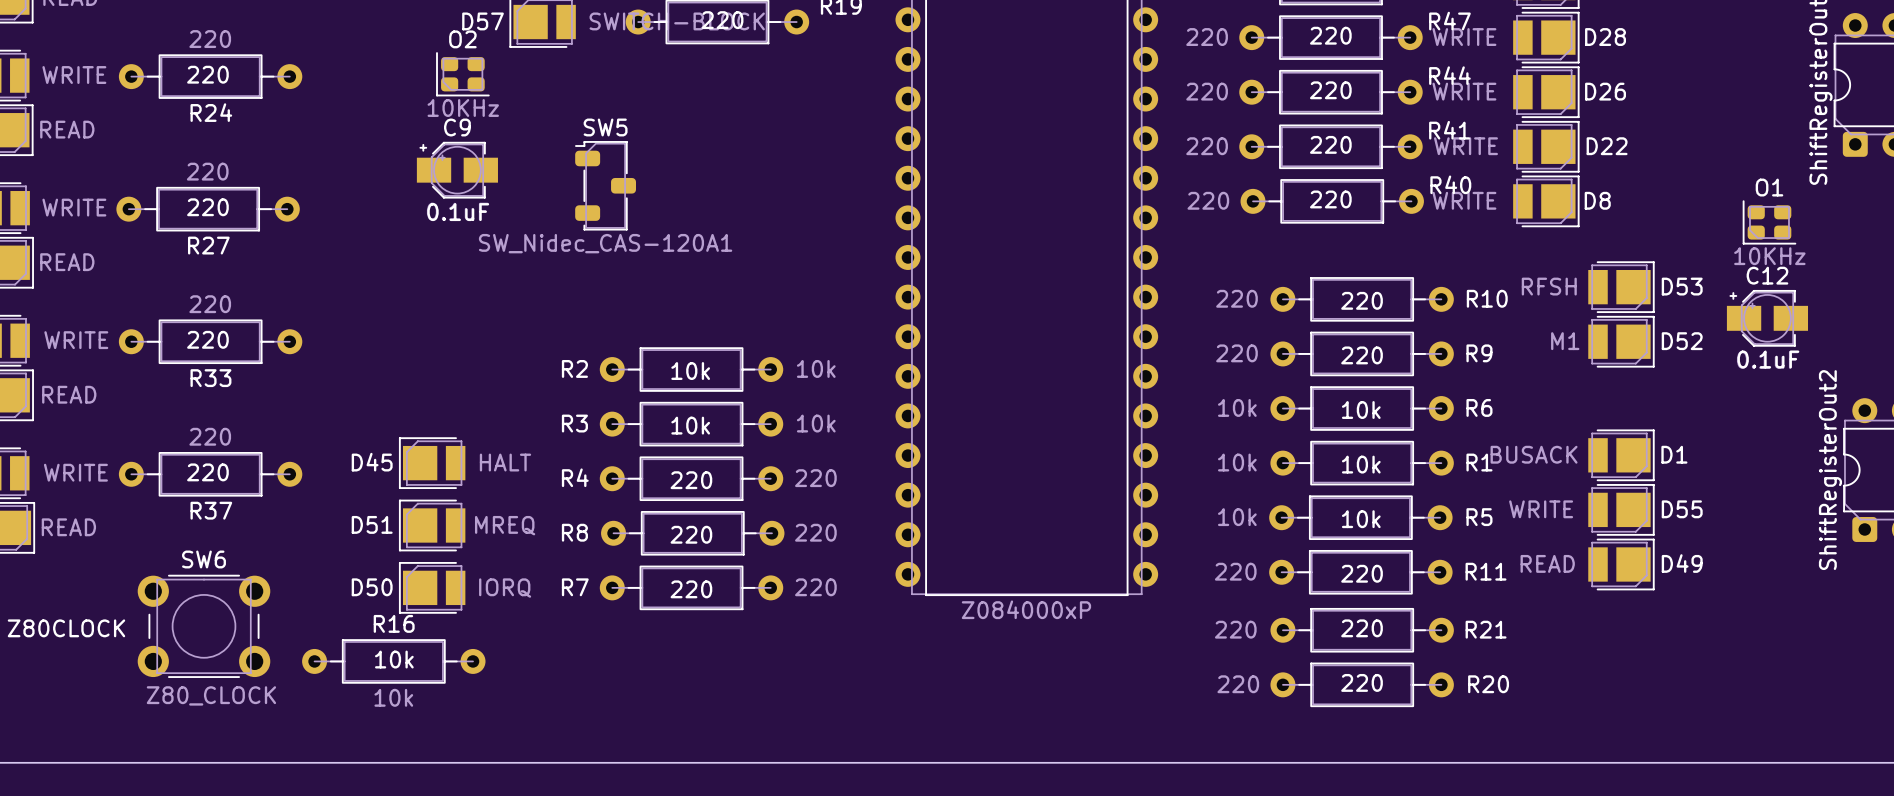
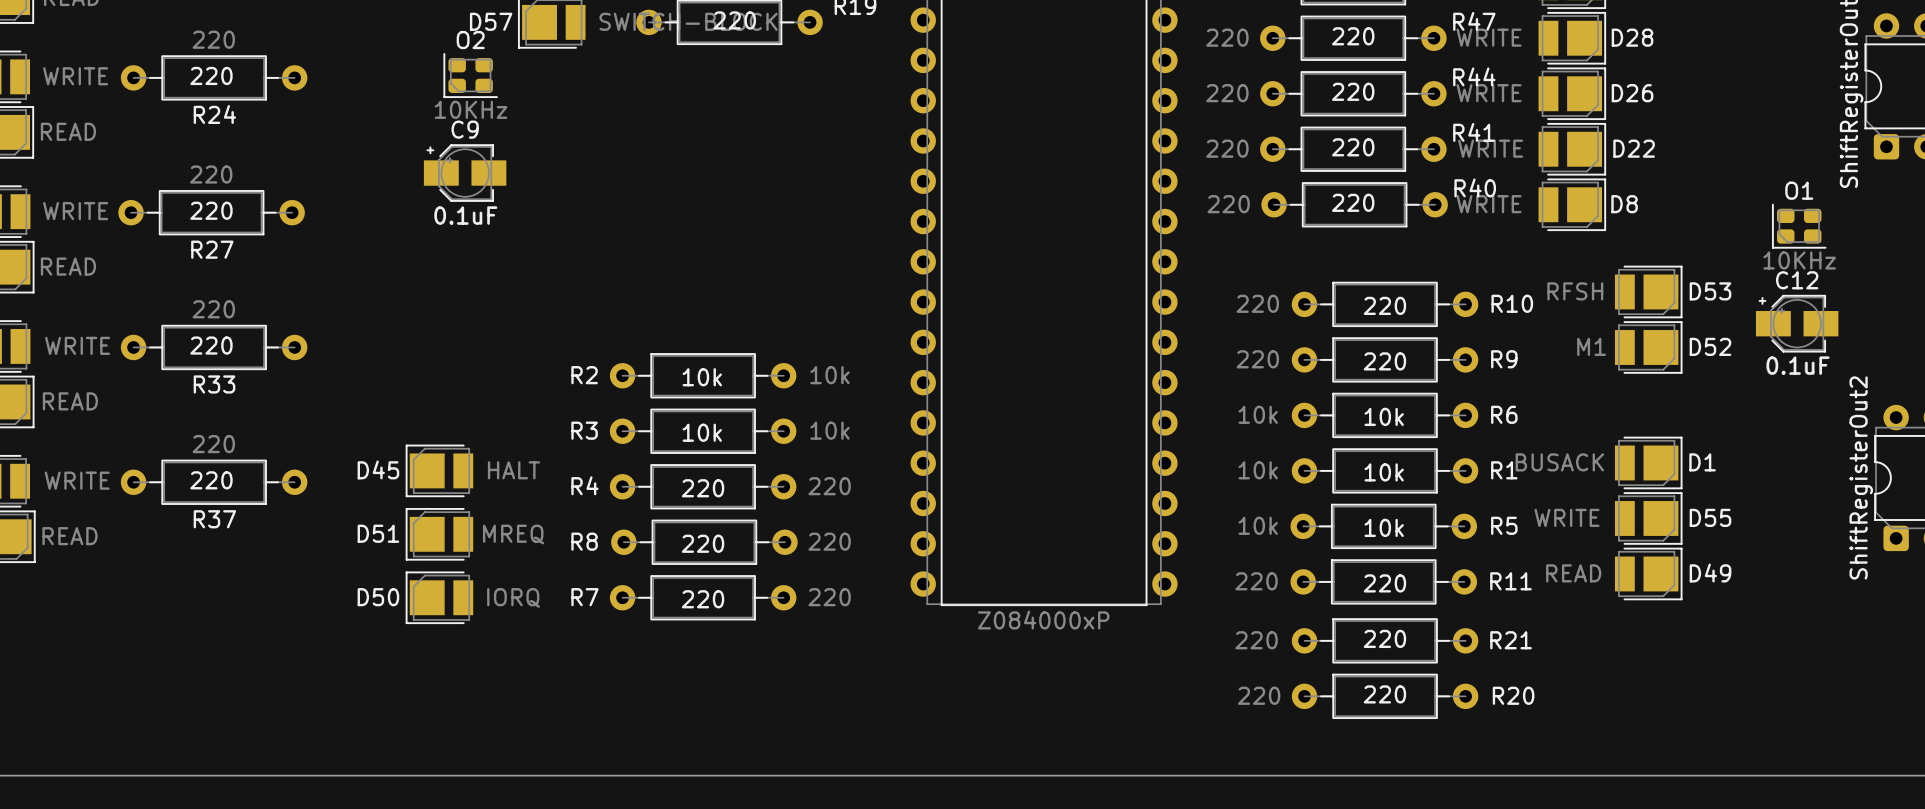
SW5: SW_Nidec_CAS-120A1 (605, 185) -> none
SW6: Z80_CLOCK (204, 626) -> none
text: Z80CLOCK (66, 628) -> none
text: 10k (394, 659) -> none
R16: 10k (393, 661) -> none

